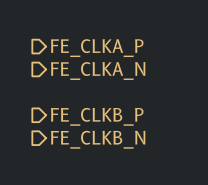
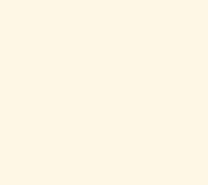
hierarchical label: FE_CLKA_P (97, 48) -> none
hierarchical label: FE_CLKA_N (98, 71) -> none
hierarchical label: FE_CLKB_P (97, 116) -> none
hierarchical label: FE_CLKB_N (98, 139) -> none

